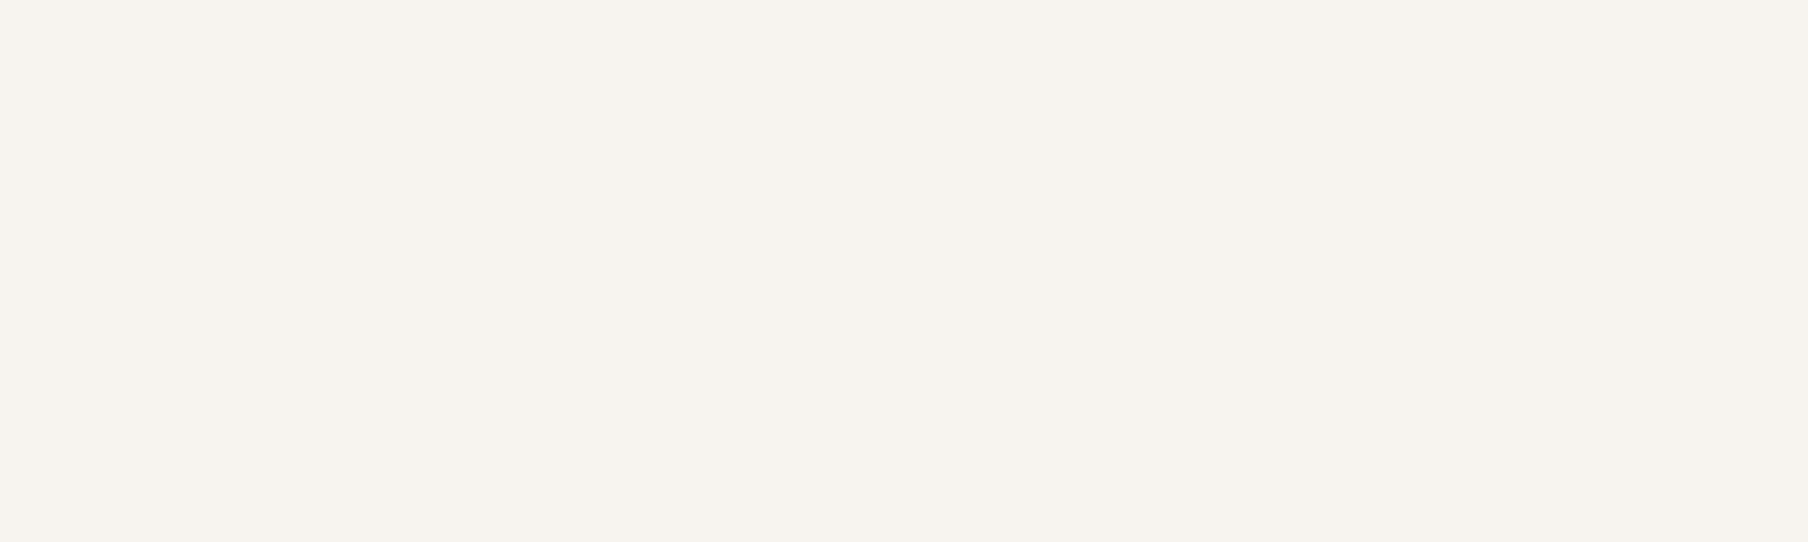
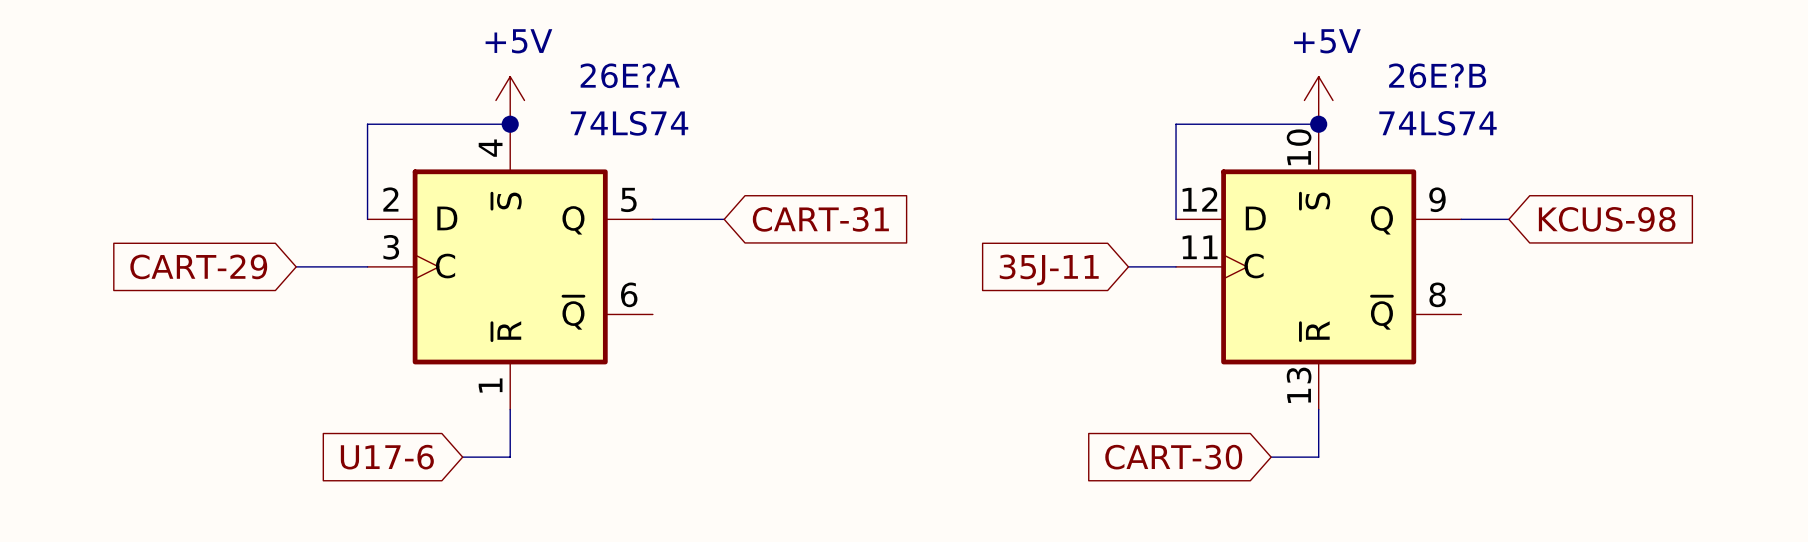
power symbol: none -> +5V (510, 100)
power symbol: none -> +5V (1318, 100)
wire: none -> (510, 124) (367, 124) (367, 219)
junction: none -> (510, 124)
wire: none -> (1318, 124) (1176, 124) (1176, 219)
junction: none -> (1318, 124)
wire: none -> (652, 219) (724, 219)
global label: none -> CART-31 (820, 219)
wire: none -> (1461, 219) (1508, 219)
global label: none -> KCUS-98 (1607, 219)
global label: none -> CART-29 (198, 266)
wire: none -> (296, 266) (367, 266)
26E?A: none -> 74LS74 (510, 266)
global label: none -> 35J-11 (1049, 269)
wire: none -> (1128, 266) (1176, 266)
26E?B: none -> 74LS74 (1318, 266)
wire: none -> (510, 409) (510, 457) (462, 457)
wire: none -> (1318, 409) (1318, 457) (1271, 457)
global label: none -> U17-6 (387, 457)
global label: none -> CART-30 (1173, 457)

